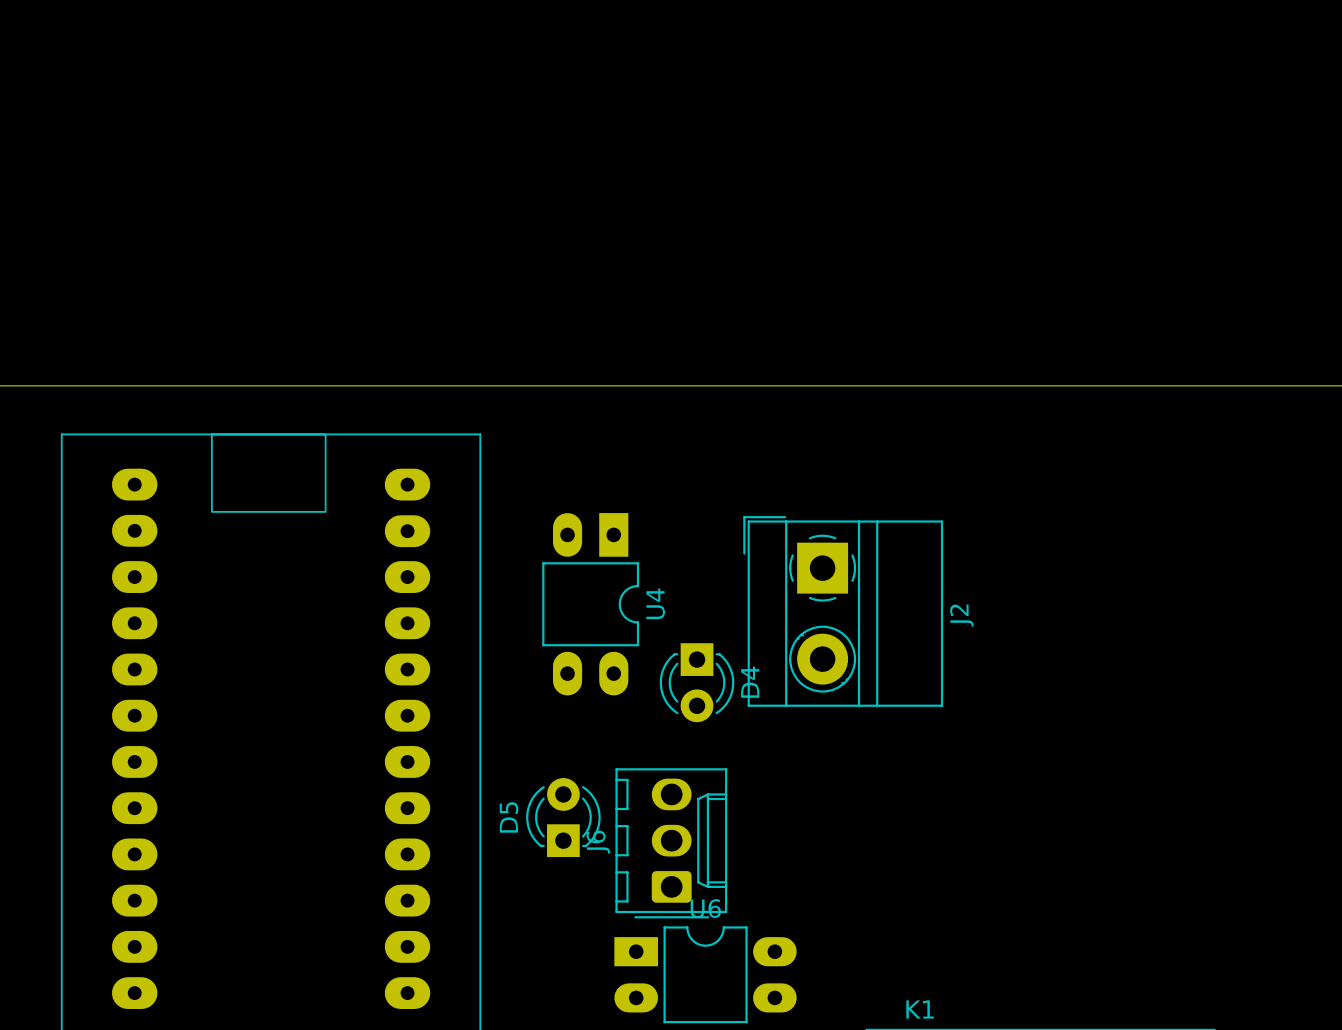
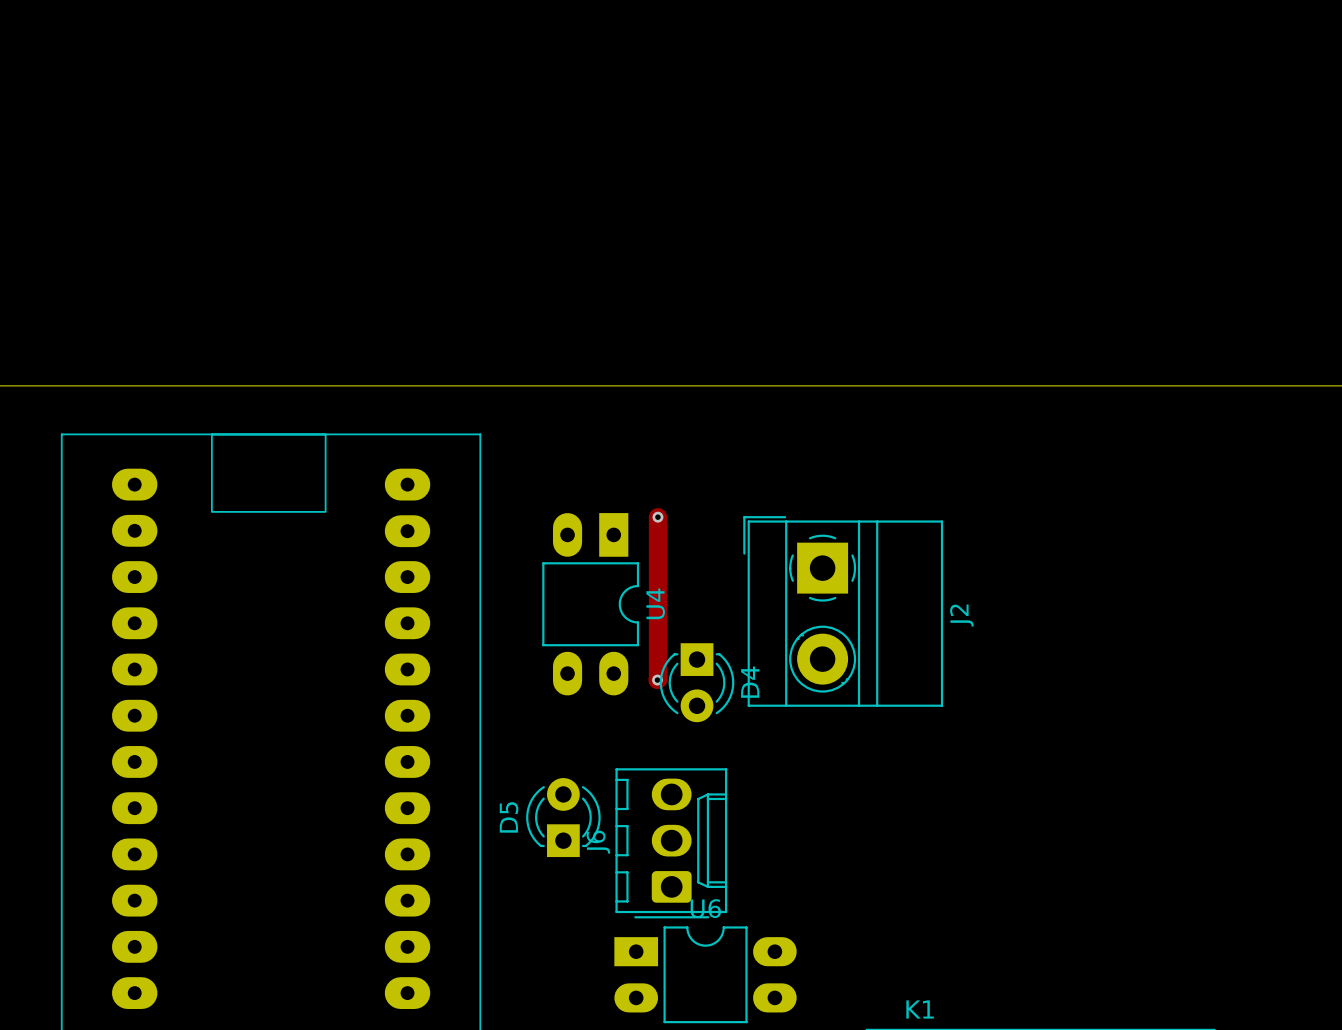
track: none -> (657, 517) (657, 680)
via: none -> (657, 517)
via: none -> (657, 680)

